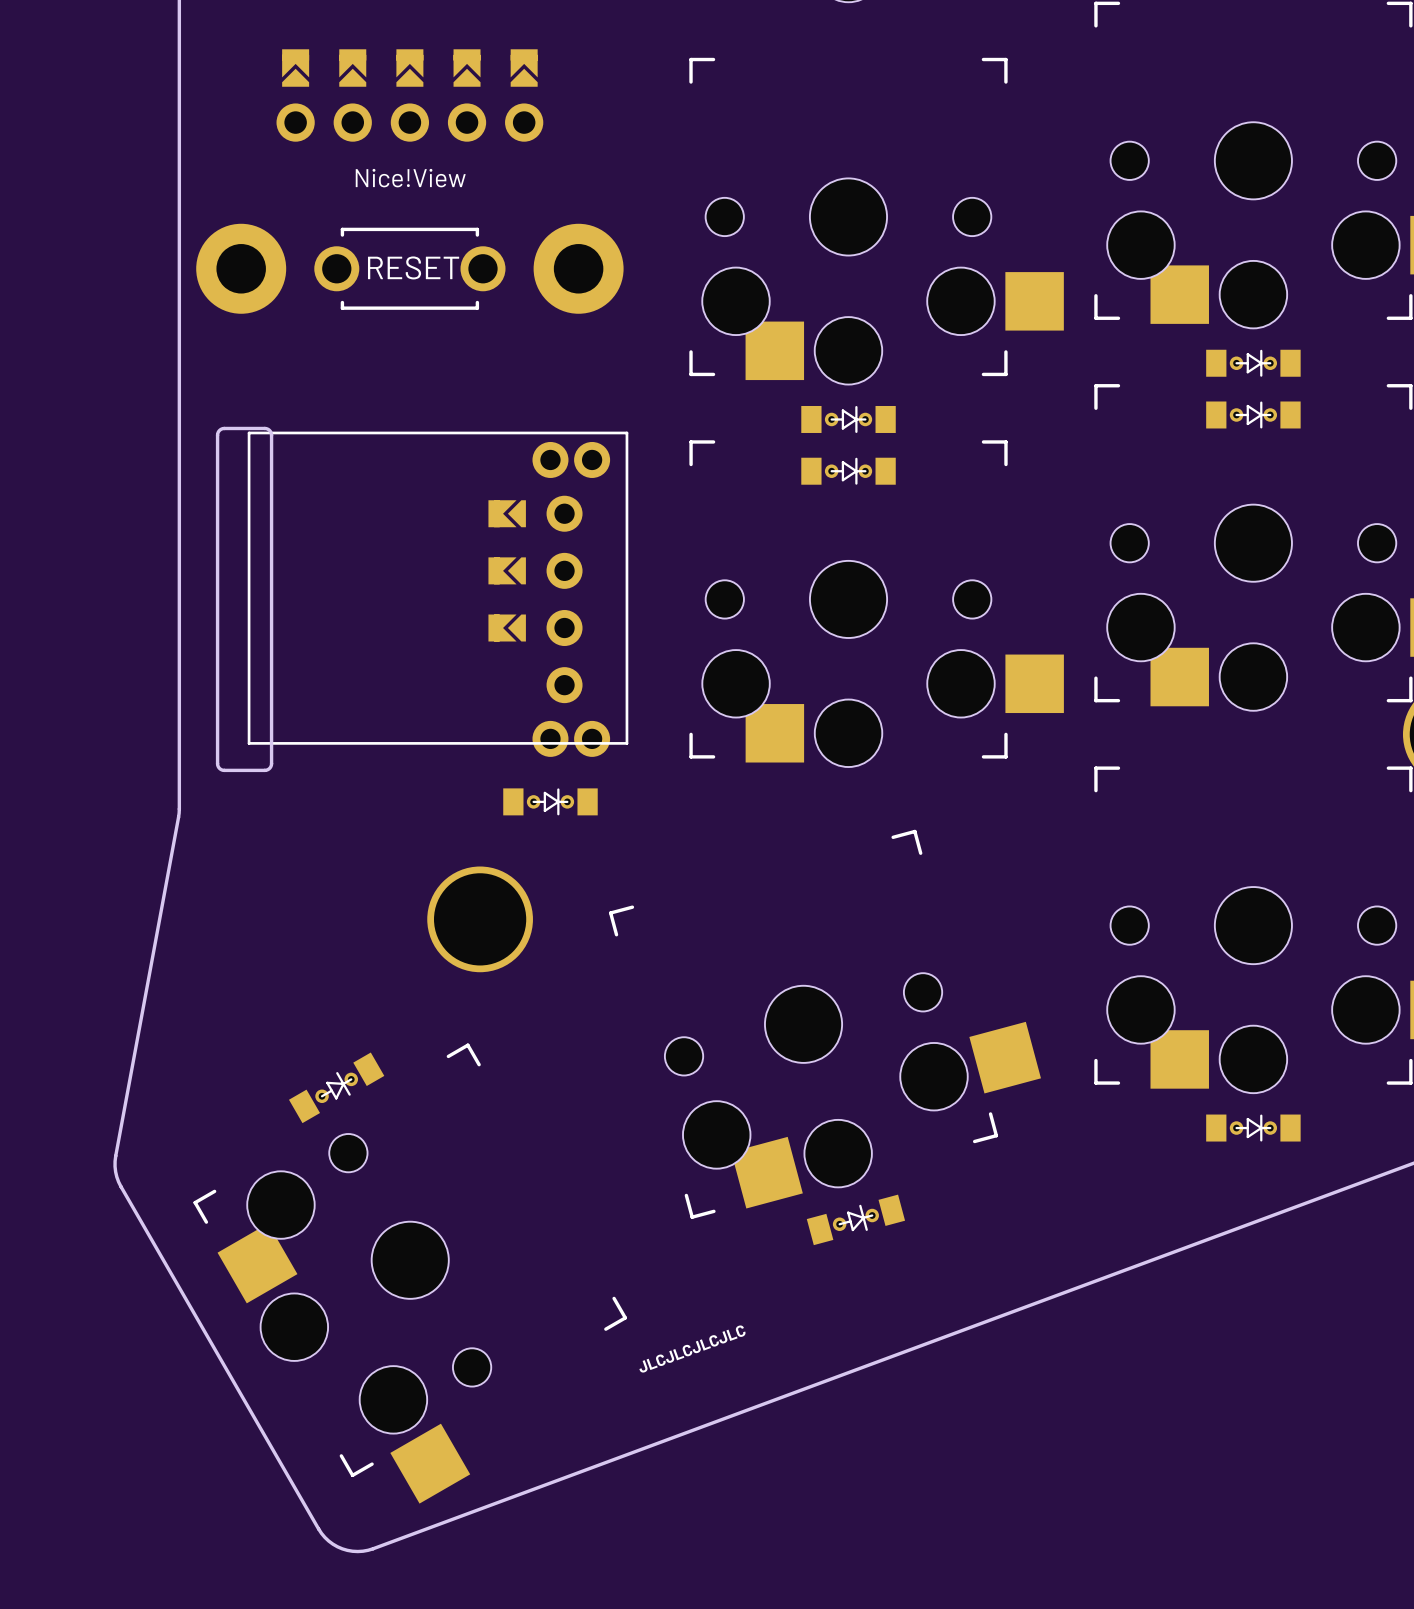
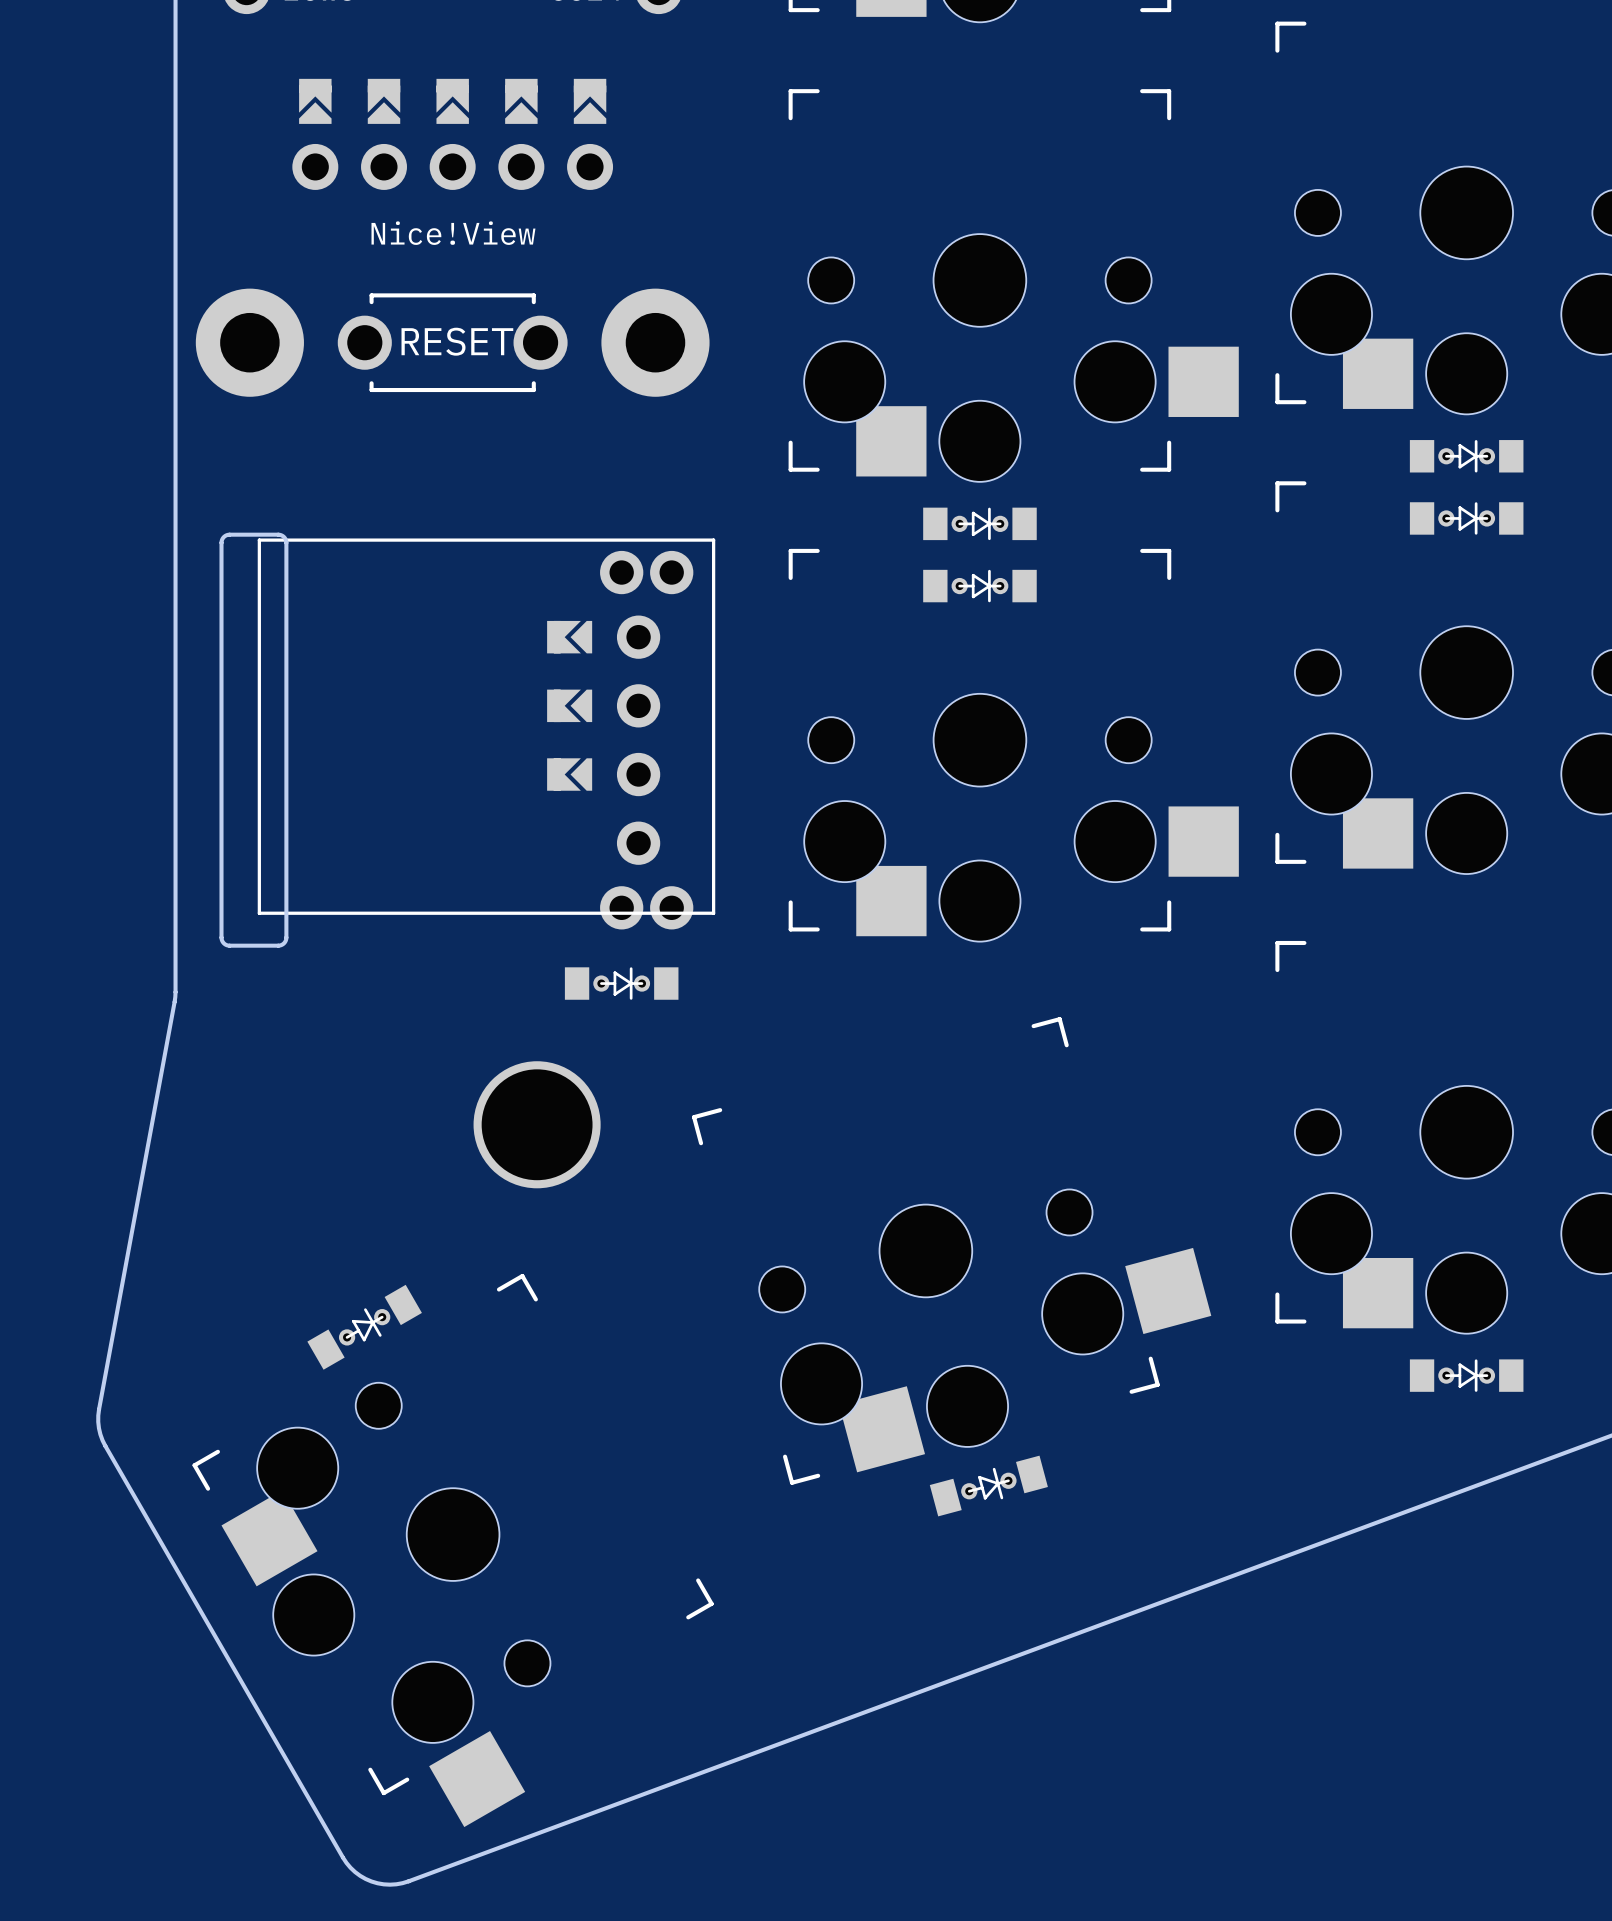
text: JLCJLCJLCJLC (692, 1349) -> none

